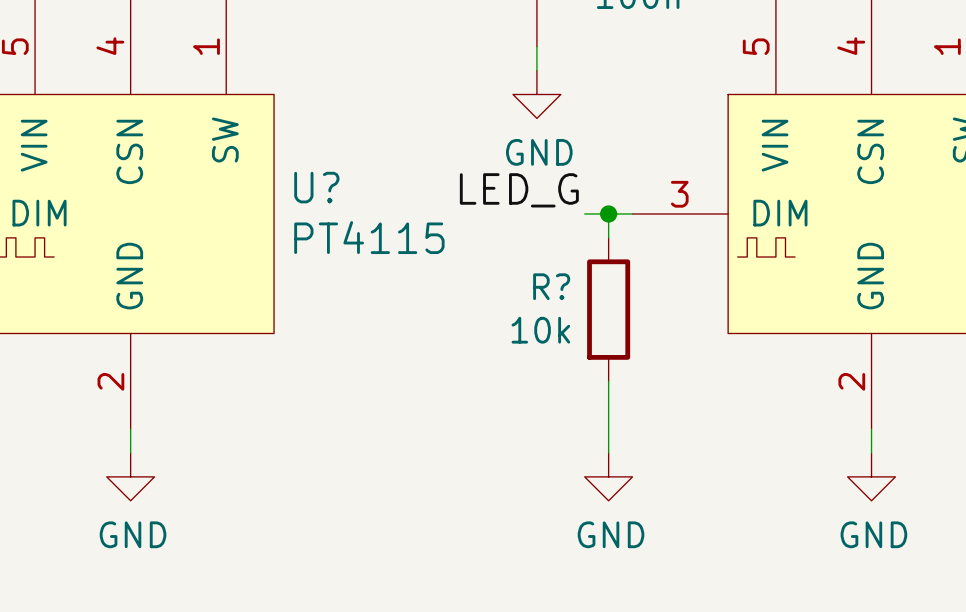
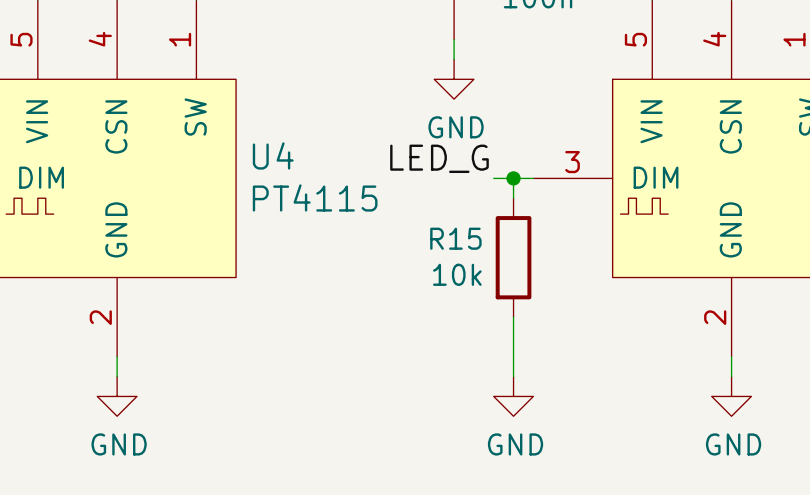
U? name: U? (316, 187) -> U4 (273, 155)
R? name: R? (551, 286) -> R15 (455, 238)

